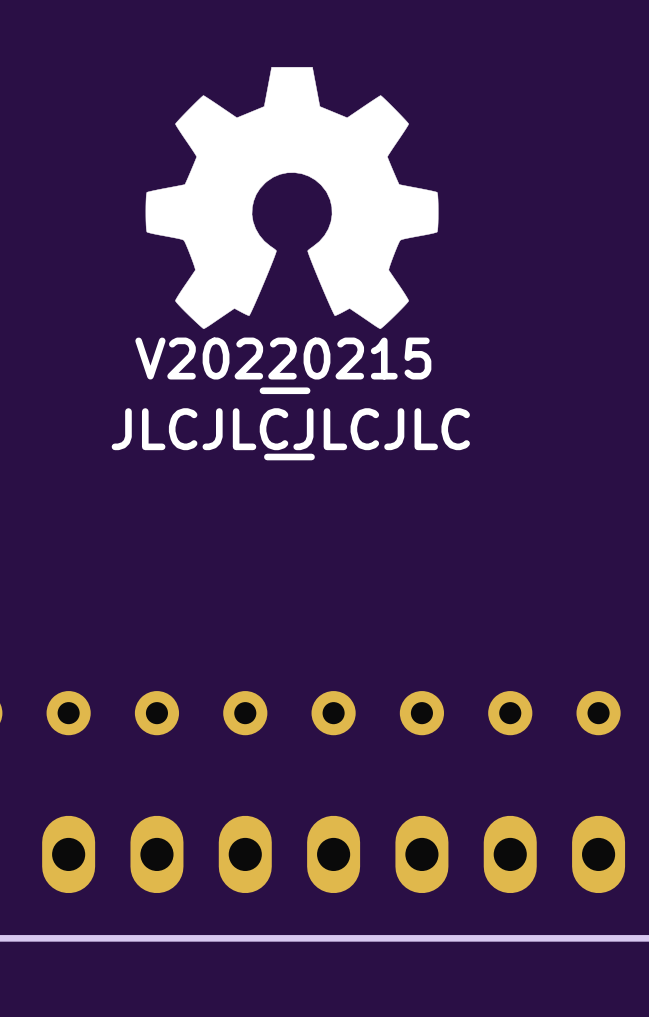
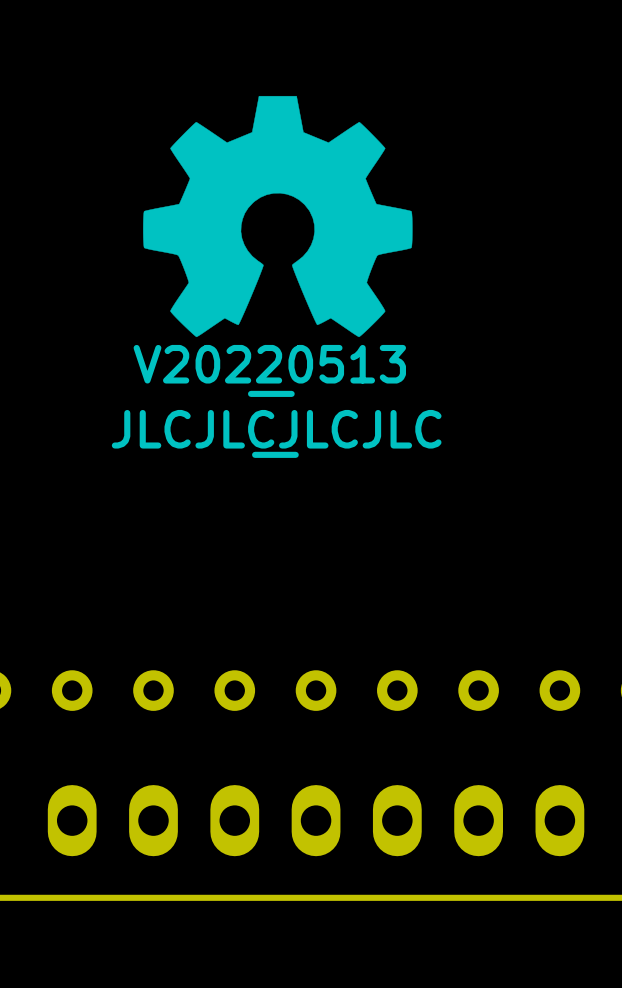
drawing shape: [135, 337, 432, 395] -> [133, 344, 406, 397]

